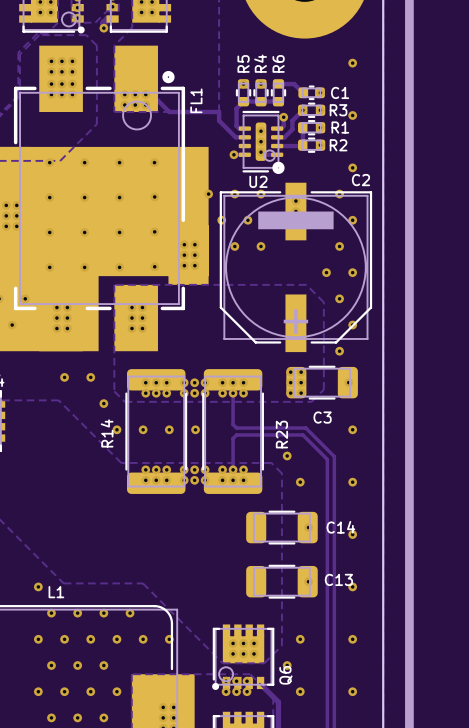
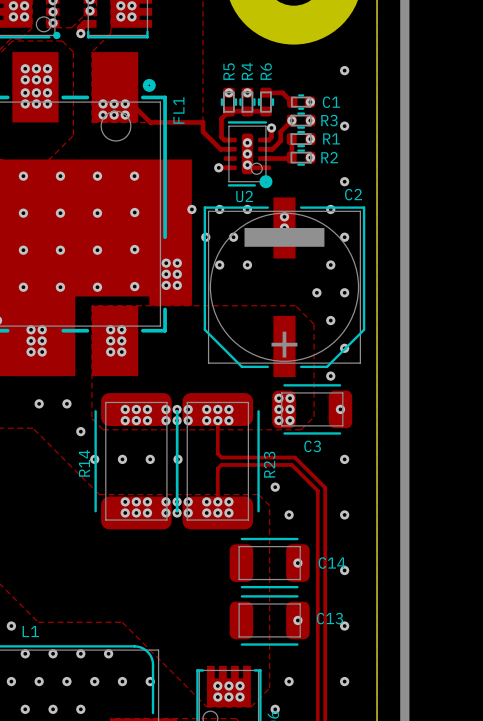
C3 footprint: [286, 365, 358, 400] -> [272, 384, 353, 435]
R14 footprint: [125, 369, 188, 494] -> [94, 393, 179, 530]
R23 footprint: [202, 369, 264, 494] -> [175, 393, 260, 530]
C14 footprint: [246, 510, 318, 545] -> [229, 537, 310, 589]
C13 footprint: [246, 564, 318, 599] -> [229, 595, 310, 646]

